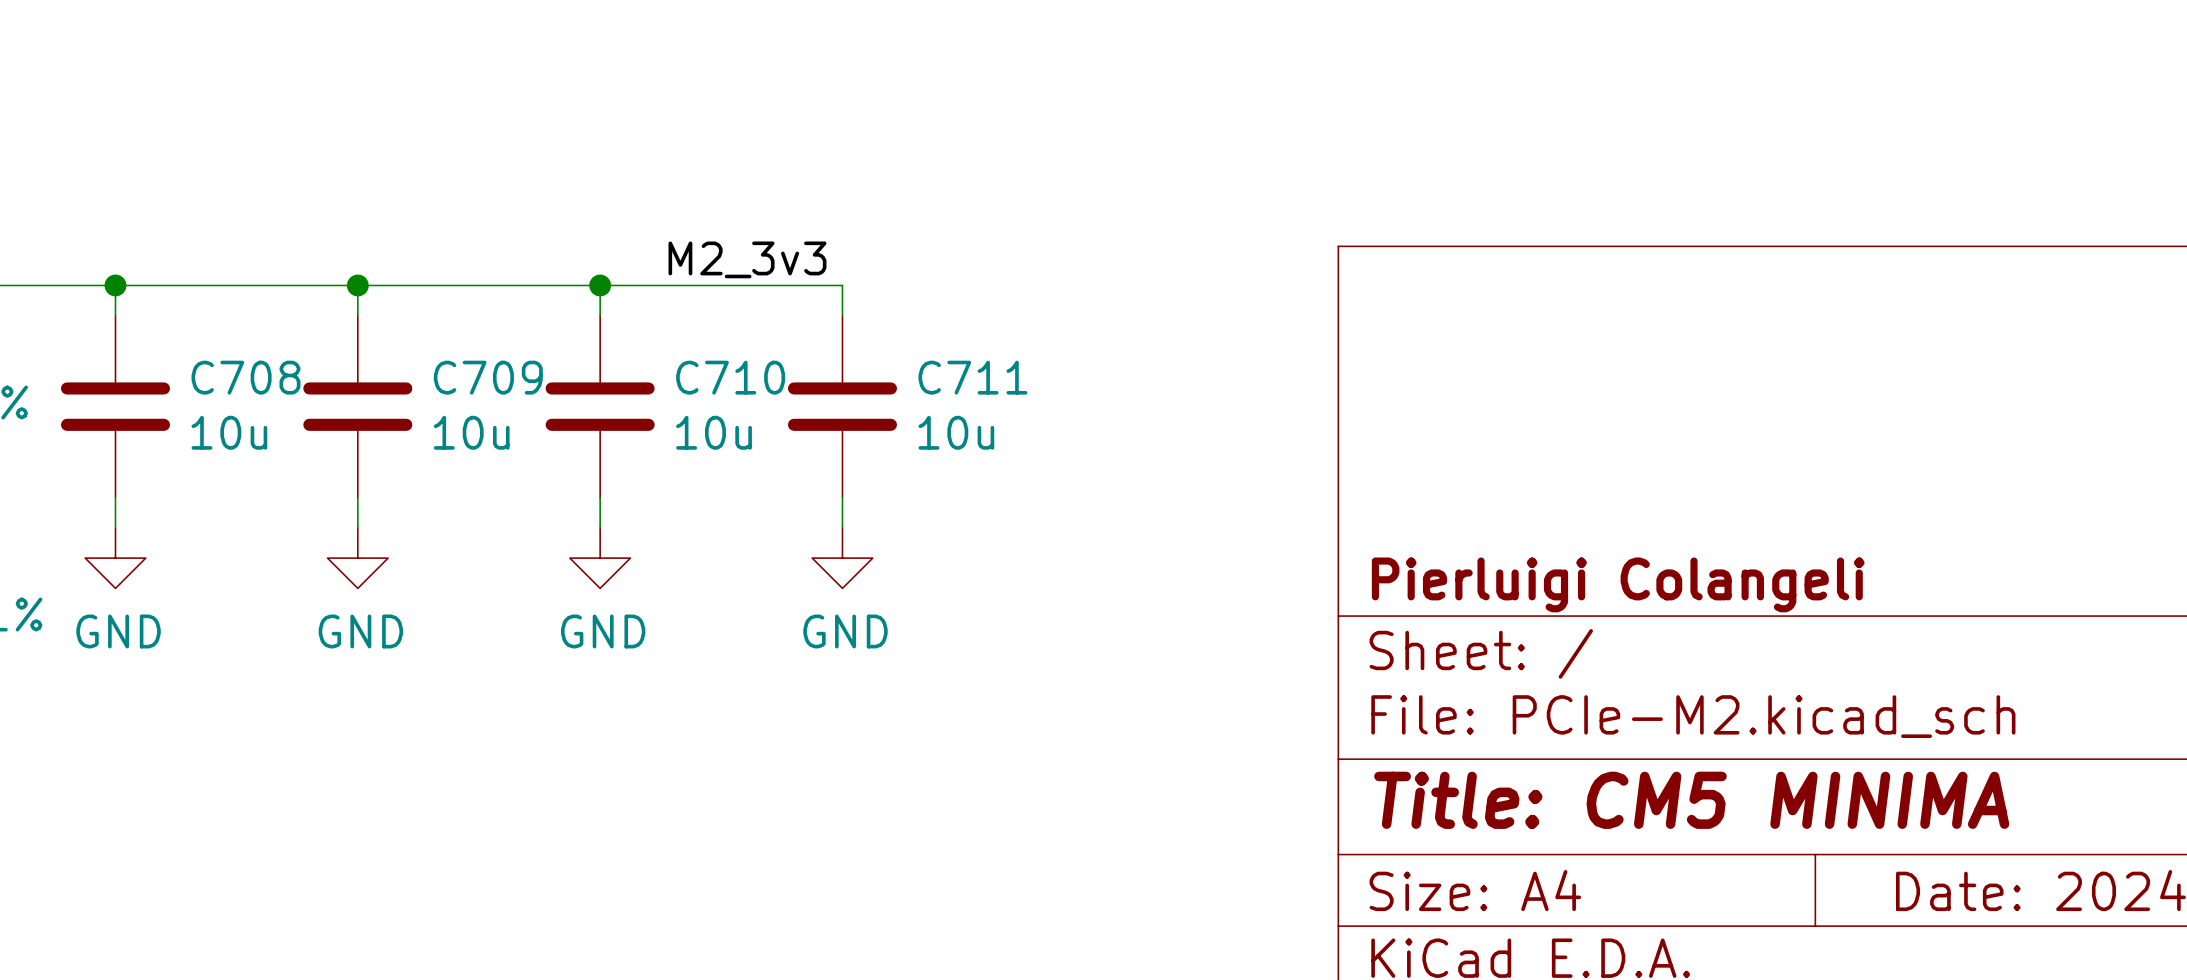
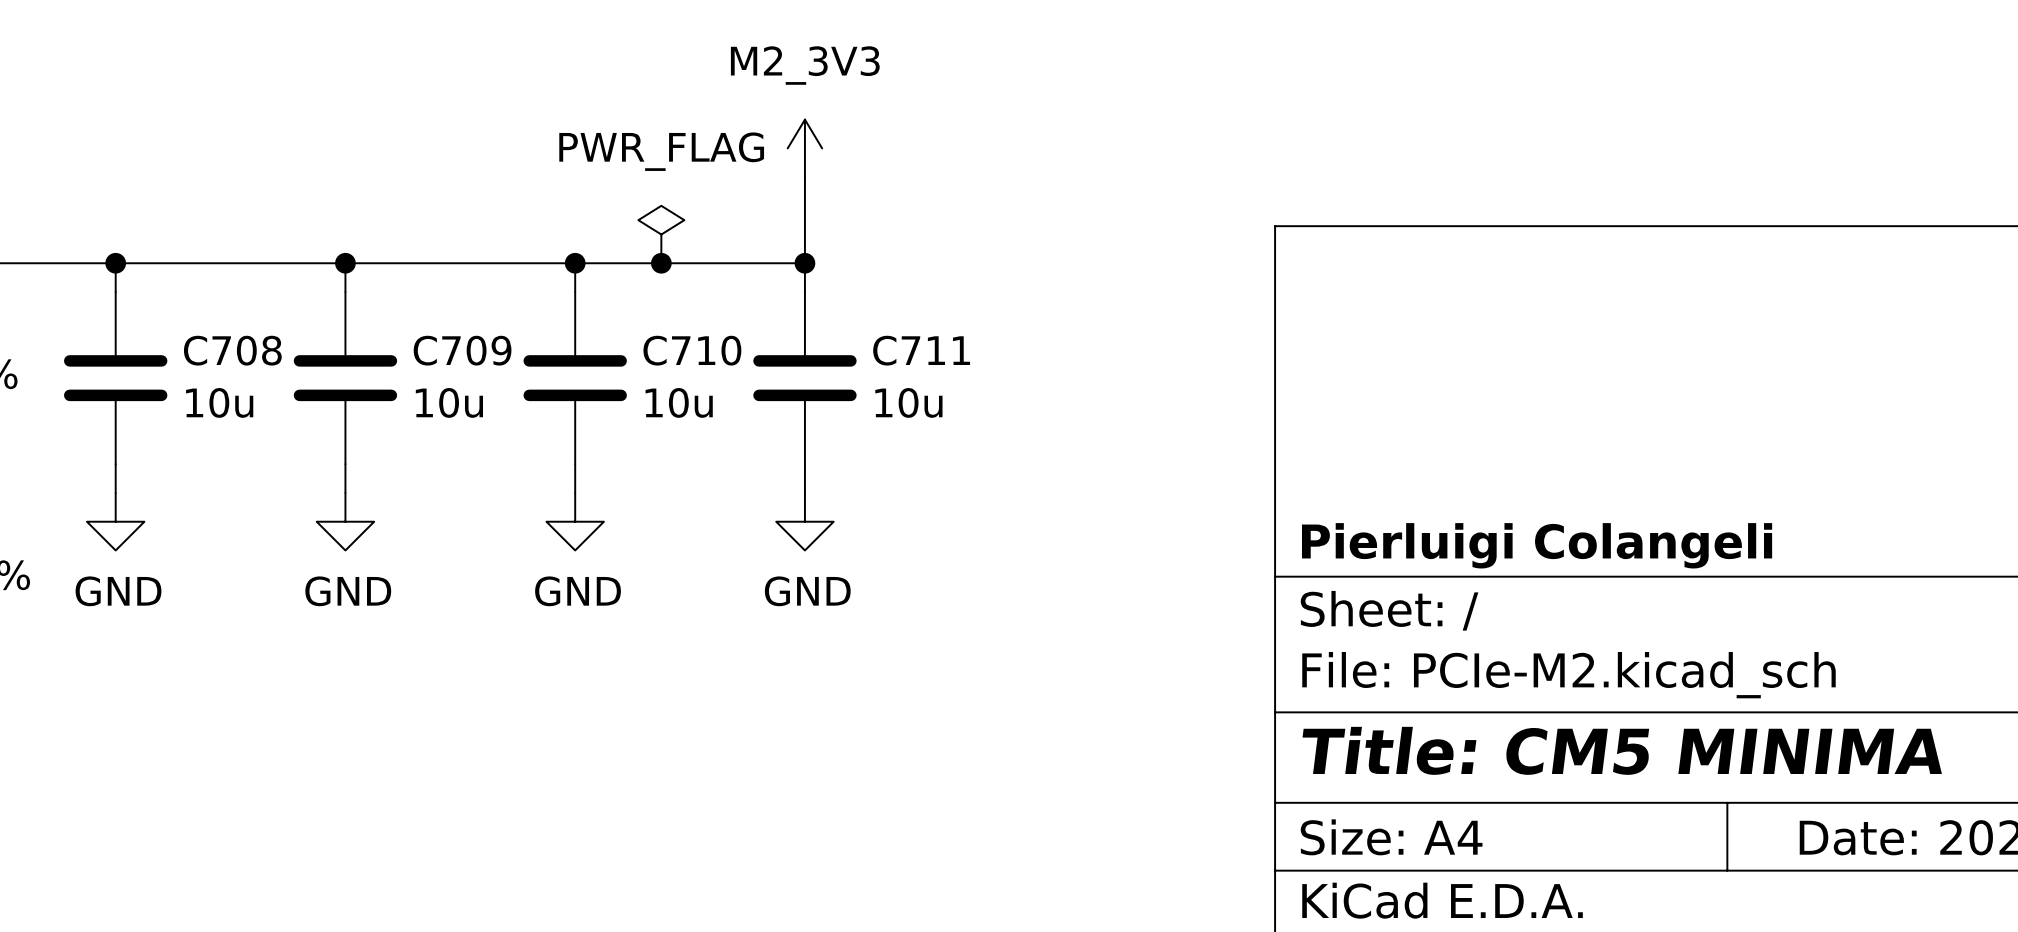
power symbol: none -> M2_3V3 (804, 148)
wire: none -> (804, 177) (804, 263)
power symbol: none -> PWR_FLAG (661, 234)
label: M2_3v3 (747, 259) -> none
junction: none -> (661, 263)
junction: none -> (804, 263)

